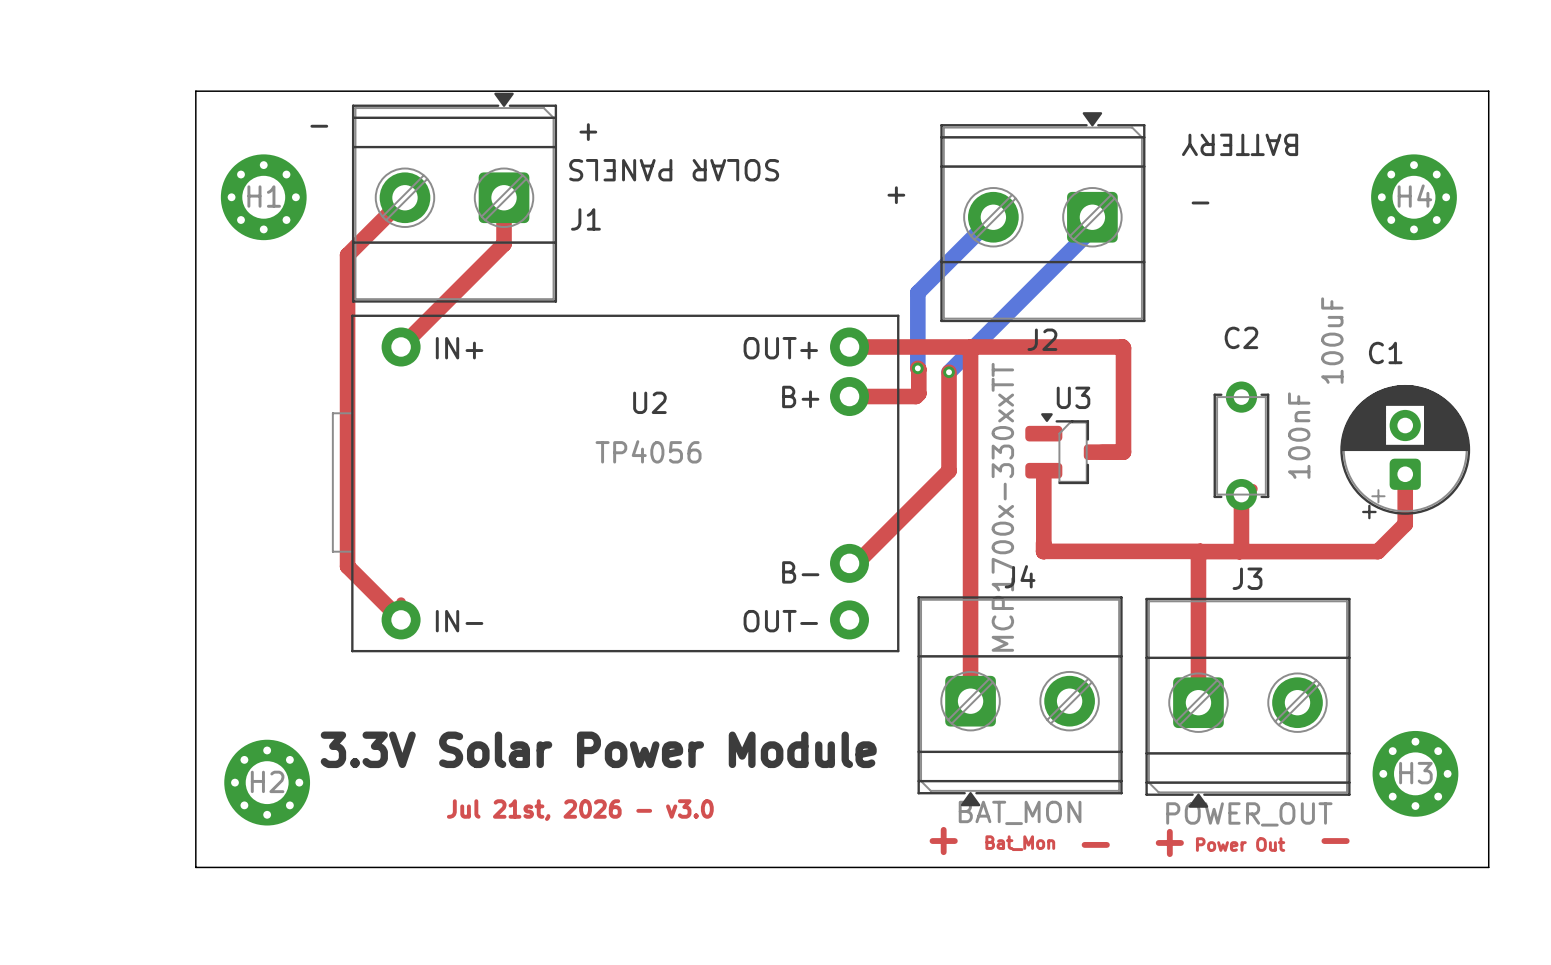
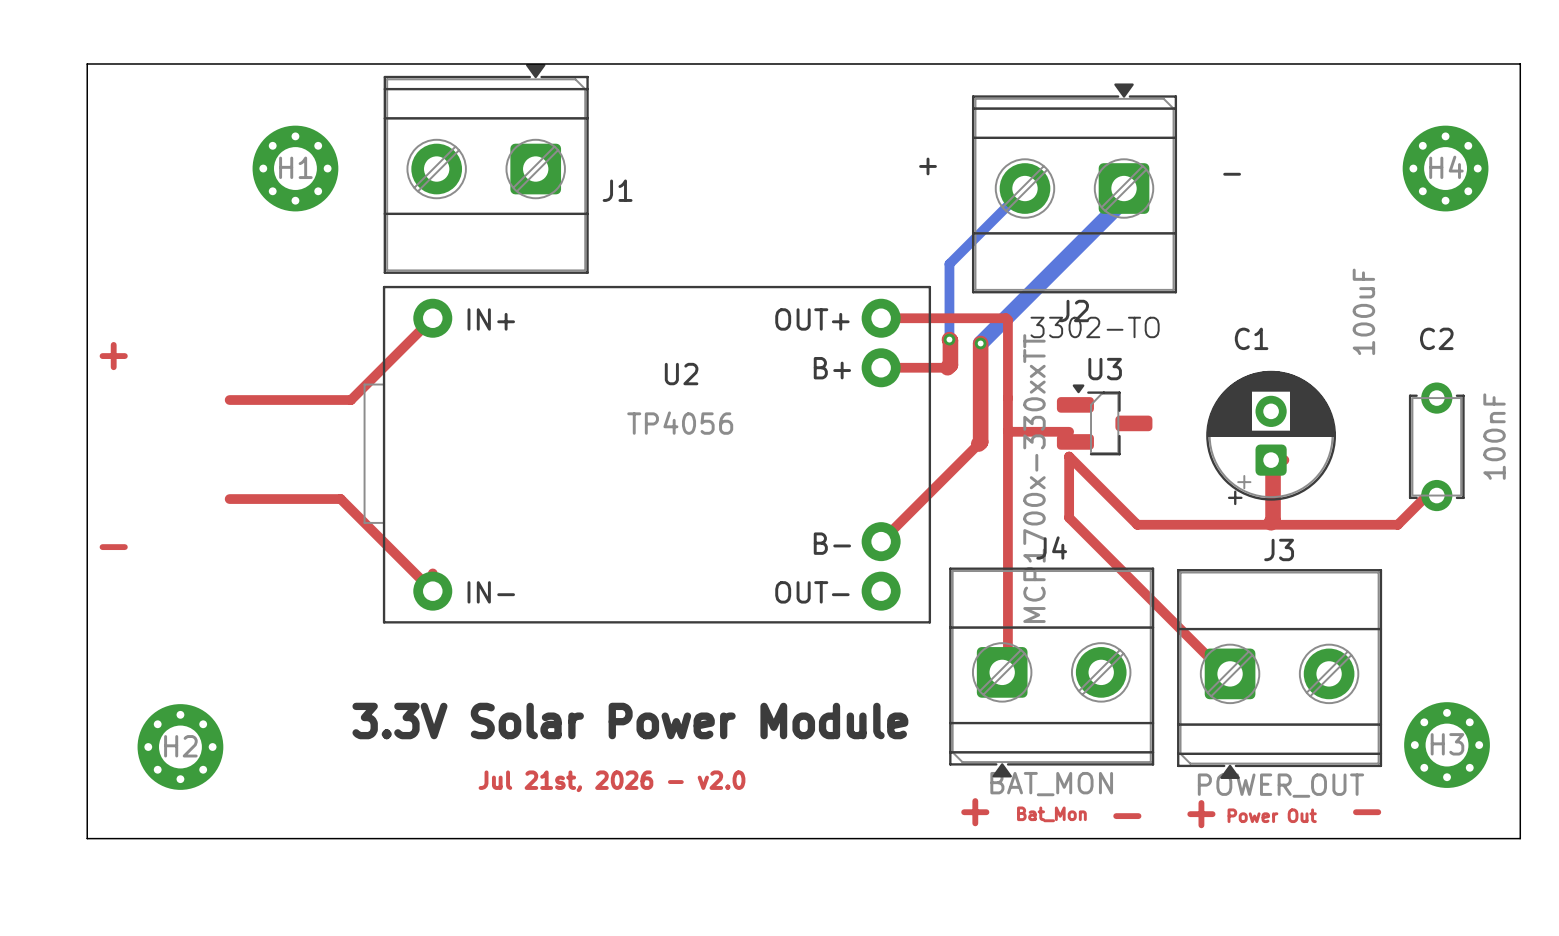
board edge: (1488, 92) (1488, 91) (195, 91) (195, 867) -> (1520, 63) (87, 63) (87, 838) (227, 838)
text: - (319, 126) -> none
text: + (588, 132) -> none
text: BATTERY (1240, 144) -> none
text: SOLAR PANELS (674, 170) -> none
top track: (404, 197) (347, 255) (347, 566) -> (229, 499) (340, 499) (379, 537)
top track: (504, 197) (504, 244) (401, 346) -> (229, 400) (351, 400) (432, 318)
bottom track width: thick (993, 217) (917, 292) (917, 368) -> thin (1024, 188) (949, 264) (949, 339)
U2 footprint: [331, 314, 900, 653] -> [363, 285, 932, 624]
top track width: thick (849, 346) (974, 346) -> thin (881, 318) (1006, 318)
top track: (971, 346) (970, 701) -> none
top track: (974, 346) (1122, 346) (1123, 452) (1102, 452) -> (1006, 318) (1007, 320) (1007, 666)
text: none -> 3302-TO (1095, 327)
text: none -> + (113, 356)
top track width: thick (849, 396) (915, 396) -> thin (881, 367) (947, 367)
C2 position: (1241, 445) -> (1436, 446)
C1 position: (1405, 452) -> (1271, 437)
top track: none -> (1007, 431) (1069, 431)
top track: (1043, 470) (1043, 551) (1200, 551) -> none
top track width: thick (947, 472) (849, 570) -> thin (978, 444) (881, 541)
top track: (1405, 474) (1405, 524) (1377, 551) (1200, 551) (1198, 553) (1198, 702) -> none
top track: none -> (1427, 495) (1397, 524) (1137, 524) (1069, 456) (1069, 517) (1225, 673)
top track width: thick (347, 566) (401, 619) -> thin (379, 537) (432, 591)
text: none -> - (113, 547)
H2 position: (267, 782) -> (180, 747)
text: Jul 21st, 2026 - v3.0 (580, 810) -> Jul 21st, 2026 - v2.0 (612, 781)

